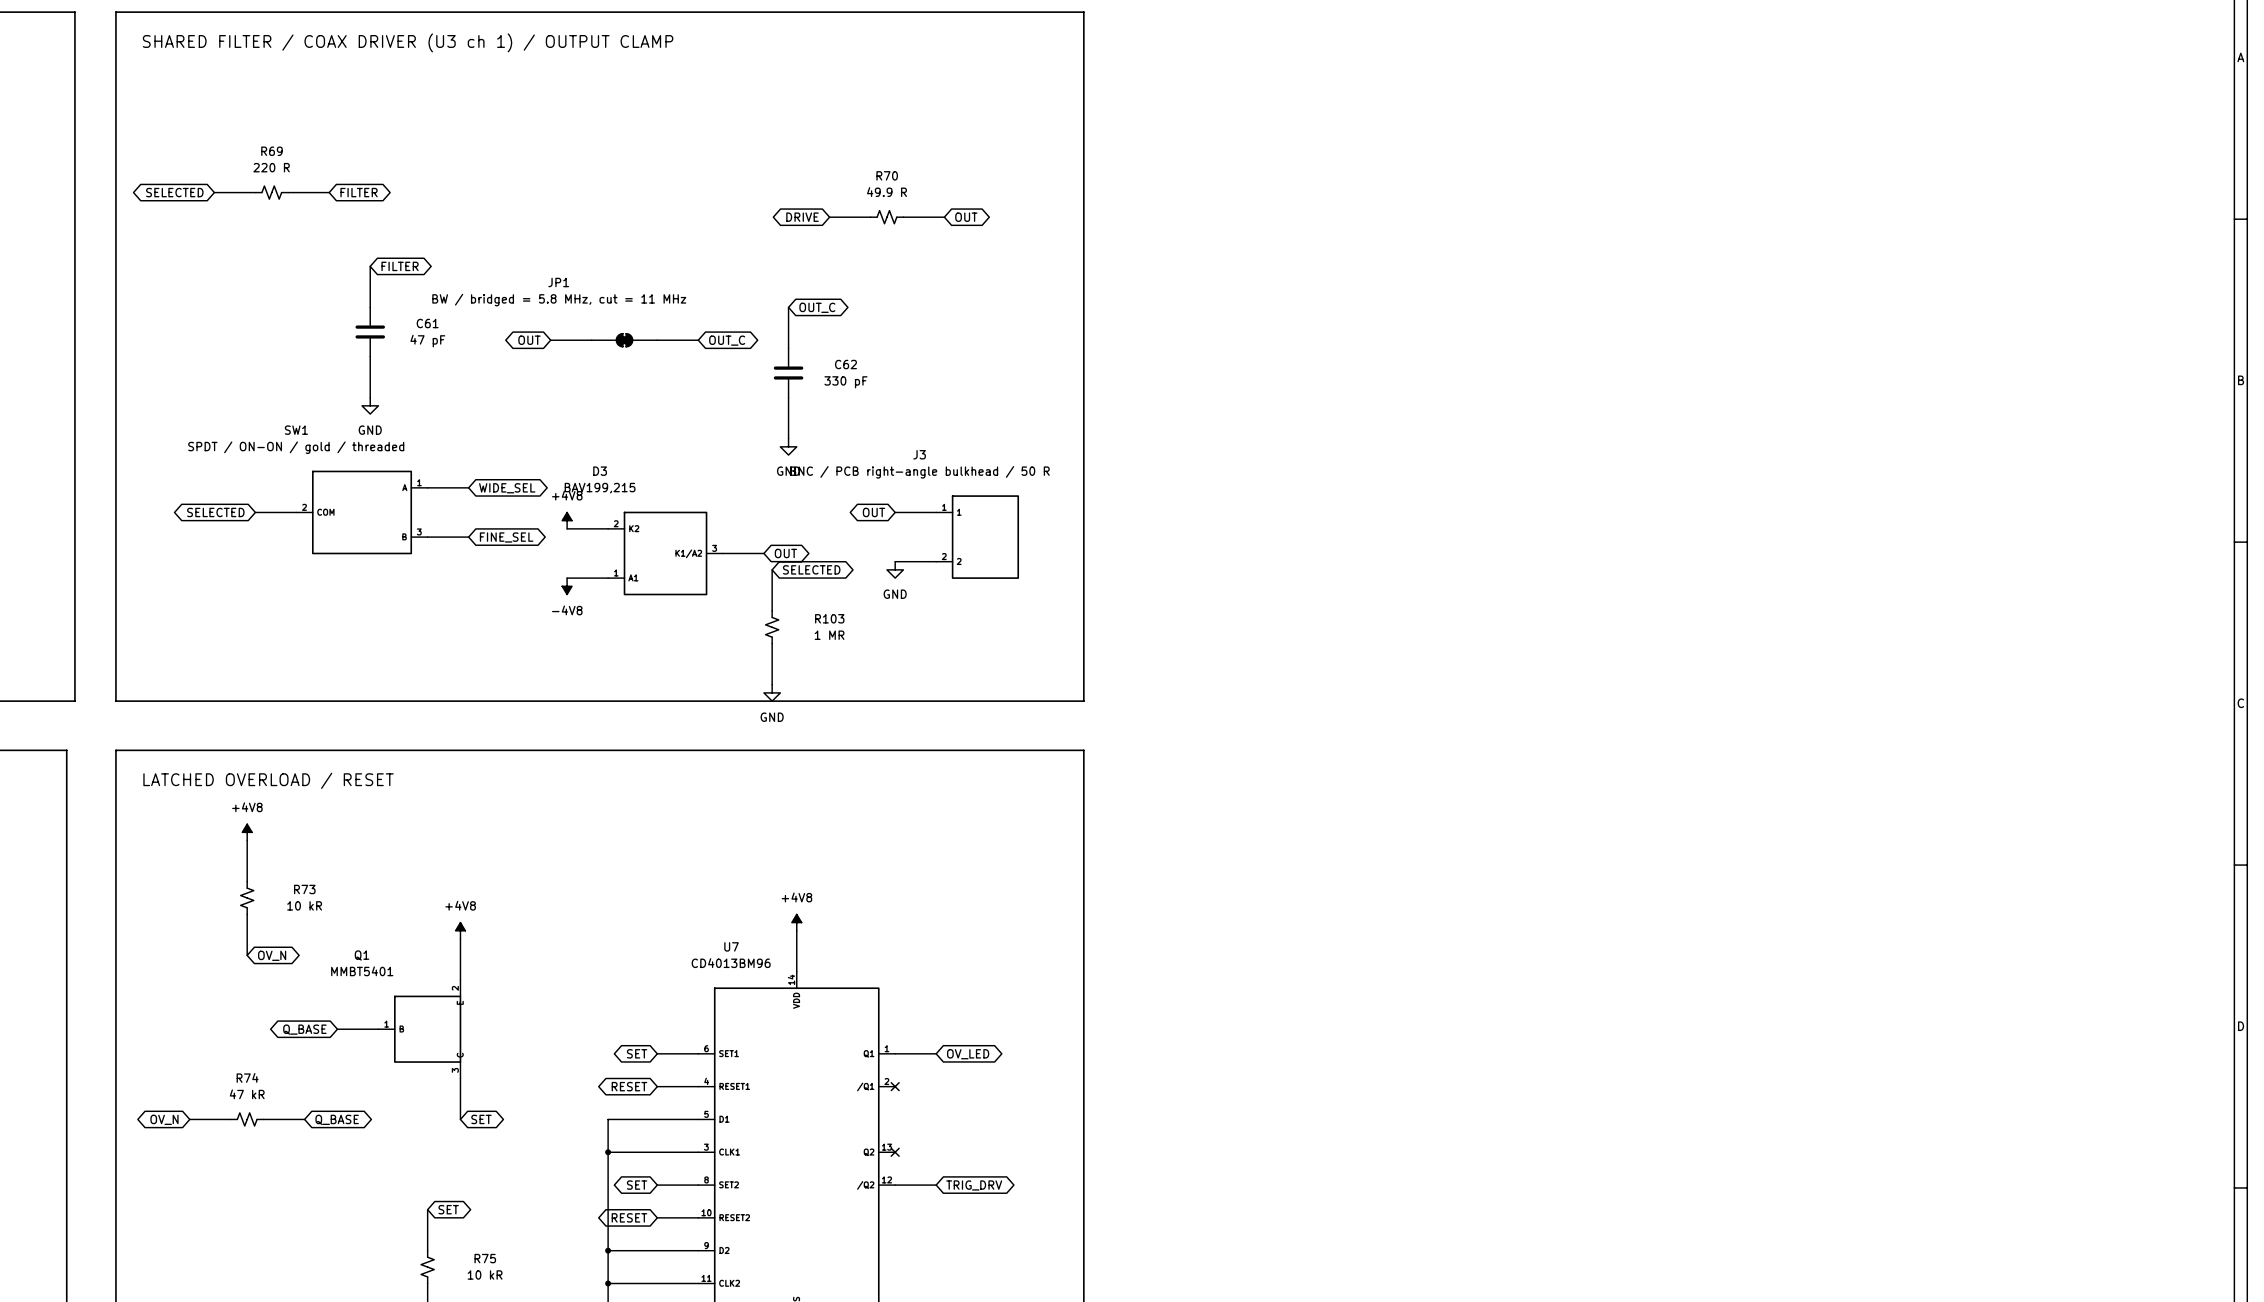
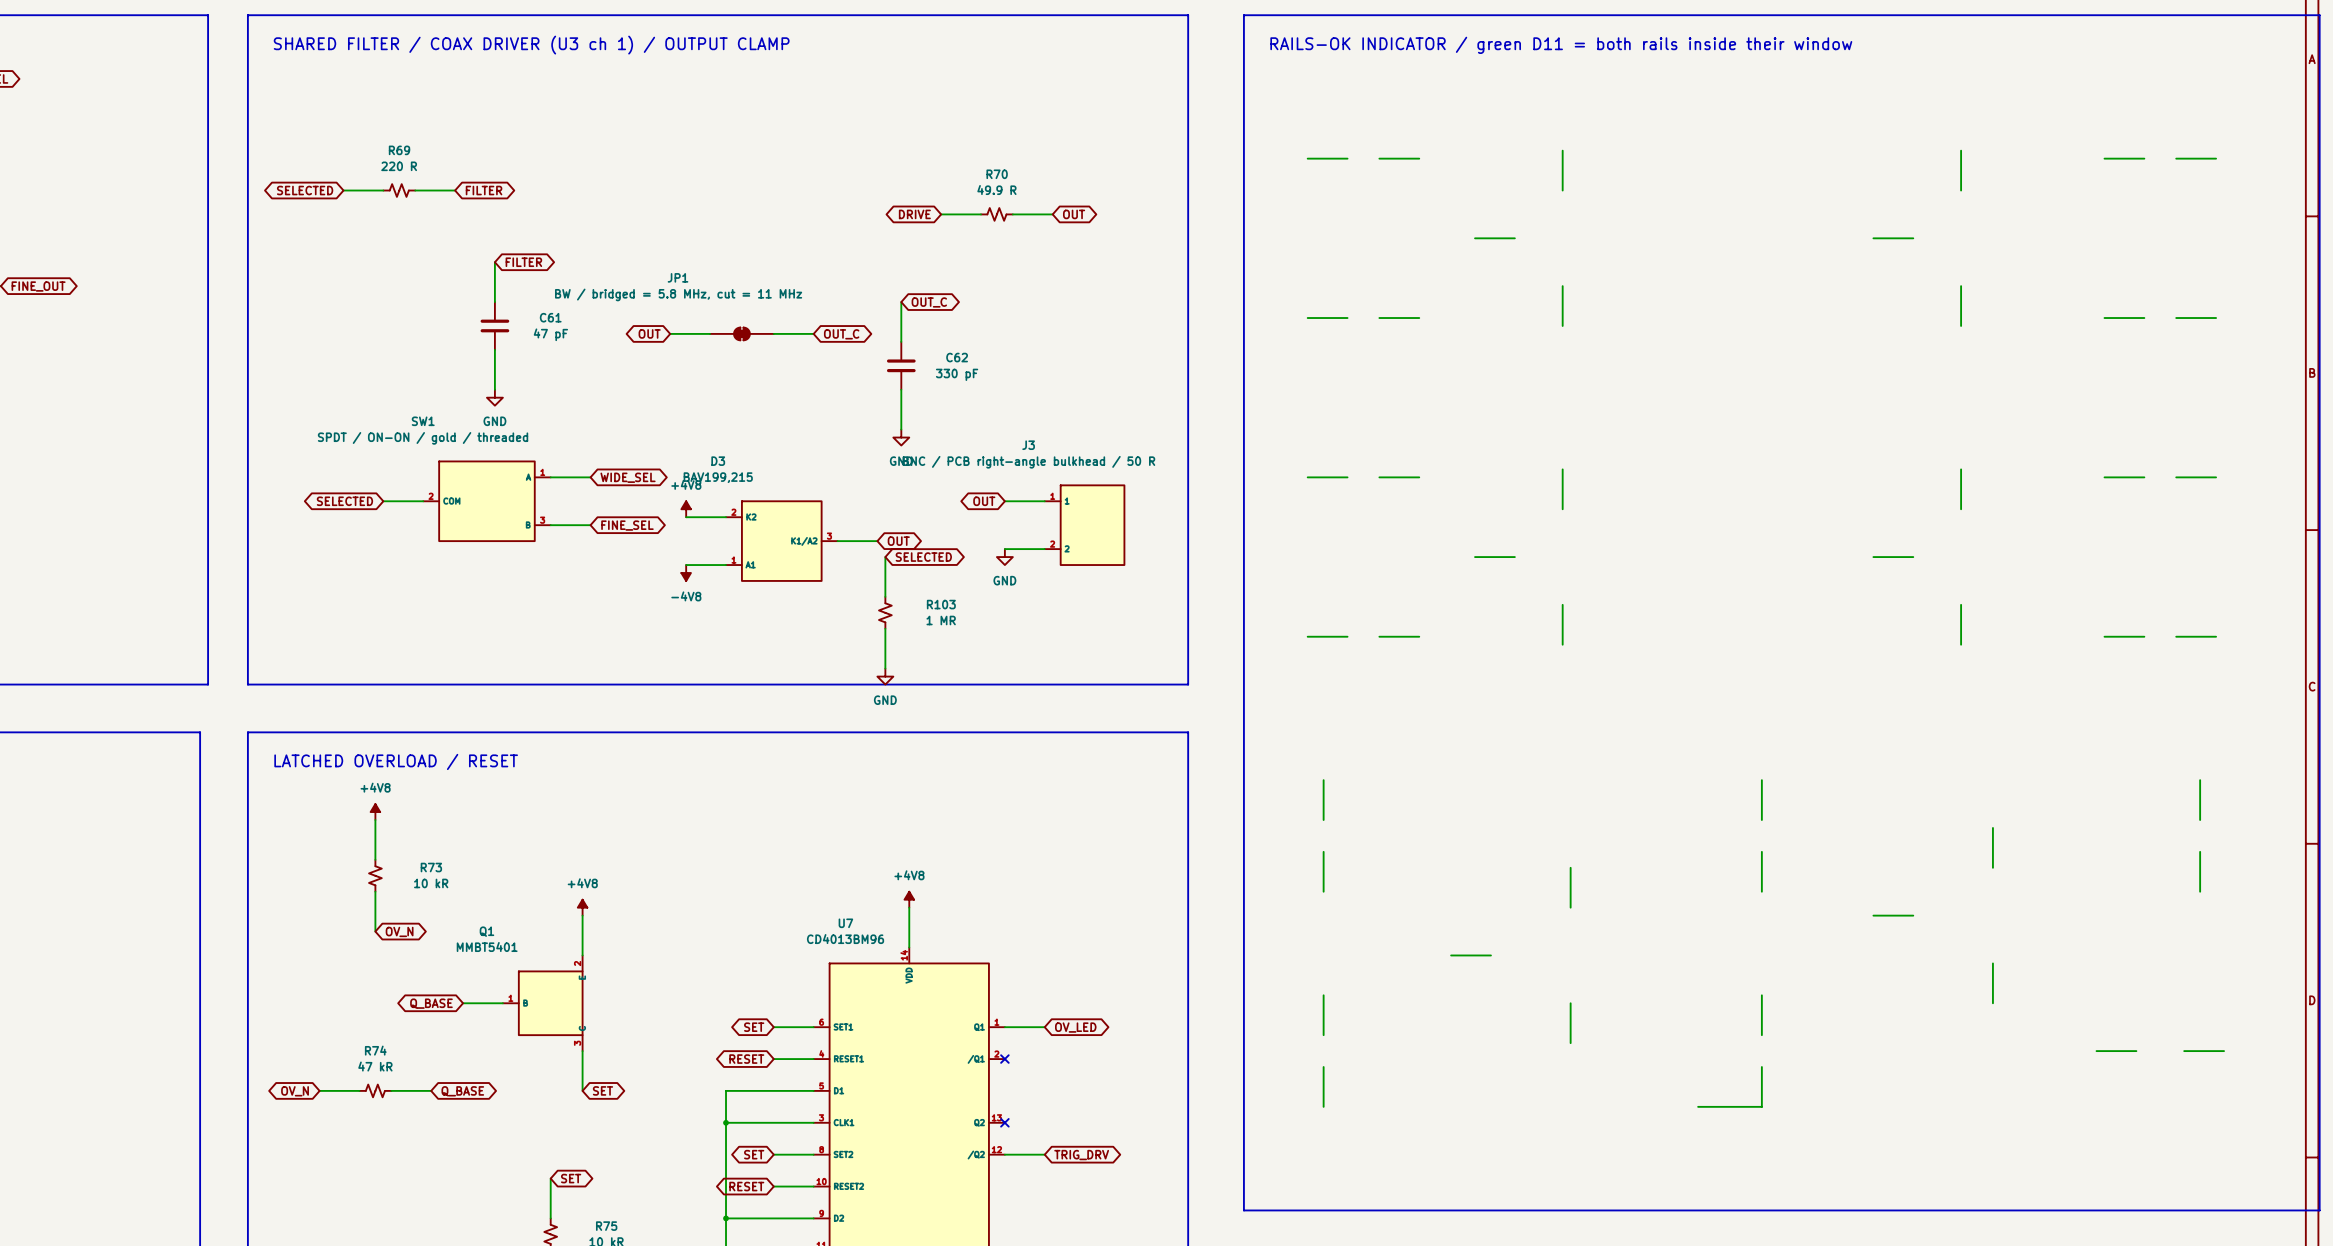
line: none -> (1243, 15) (2319, 15) (2319, 1210) (1243, 1210) (1243, 15)
text: none -> RAILS-OK INDICATOR / green D11 = both rails inside their window (1561, 45)
wire: none -> (1562, 150) (1562, 190)
wire: none -> (1961, 150) (1961, 190)
wire: none -> (1307, 158) (1347, 158)
wire: none -> (1379, 158) (1419, 158)
wire: none -> (2104, 158) (2144, 158)
wire: none -> (2176, 158) (2216, 158)
wire: none -> (1475, 238) (1514, 238)
wire: none -> (1873, 238) (1913, 238)
wire: none -> (1562, 286) (1562, 325)
wire: none -> (1961, 286) (1961, 325)
wire: none -> (1307, 318) (1347, 318)
wire: none -> (1379, 318) (1419, 318)
wire: none -> (2104, 318) (2144, 318)
wire: none -> (2176, 318) (2216, 318)
wire: none -> (1562, 469) (1562, 509)
wire: none -> (1961, 469) (1961, 509)
wire: none -> (1307, 477) (1347, 477)
wire: none -> (1379, 477) (1419, 477)
wire: none -> (2104, 477) (2144, 477)
wire: none -> (2176, 477) (2216, 477)
wire: none -> (1475, 557) (1514, 557)
wire: none -> (1873, 557) (1913, 557)
wire: none -> (1562, 604) (1562, 644)
wire: none -> (1961, 604) (1961, 644)
wire: none -> (1307, 636) (1347, 636)
wire: none -> (1379, 636) (1419, 636)
wire: none -> (2104, 636) (2144, 636)
wire: none -> (2176, 636) (2216, 636)
wire: none -> (1323, 780) (1323, 820)
wire: none -> (1761, 780) (1761, 820)
wire: none -> (2200, 780) (2200, 820)
wire: none -> (1992, 827) (1992, 867)
wire: none -> (1323, 851) (1323, 891)
wire: none -> (1761, 851) (1761, 891)
wire: none -> (2200, 851) (2200, 891)
wire: none -> (1570, 867) (1570, 907)
wire: none -> (1873, 915) (1913, 915)
wire: none -> (1451, 955) (1490, 955)
wire: none -> (1992, 963) (1992, 1003)
wire: none -> (1323, 995) (1323, 1035)
wire: none -> (1761, 995) (1761, 1035)
wire: none -> (1570, 1003) (1570, 1043)
wire: none -> (2096, 1051) (2136, 1051)
wire: none -> (2184, 1051) (2224, 1051)
wire: none -> (1323, 1067) (1323, 1106)
wire: none -> (1761, 1067) (1761, 1106) (1698, 1106)

